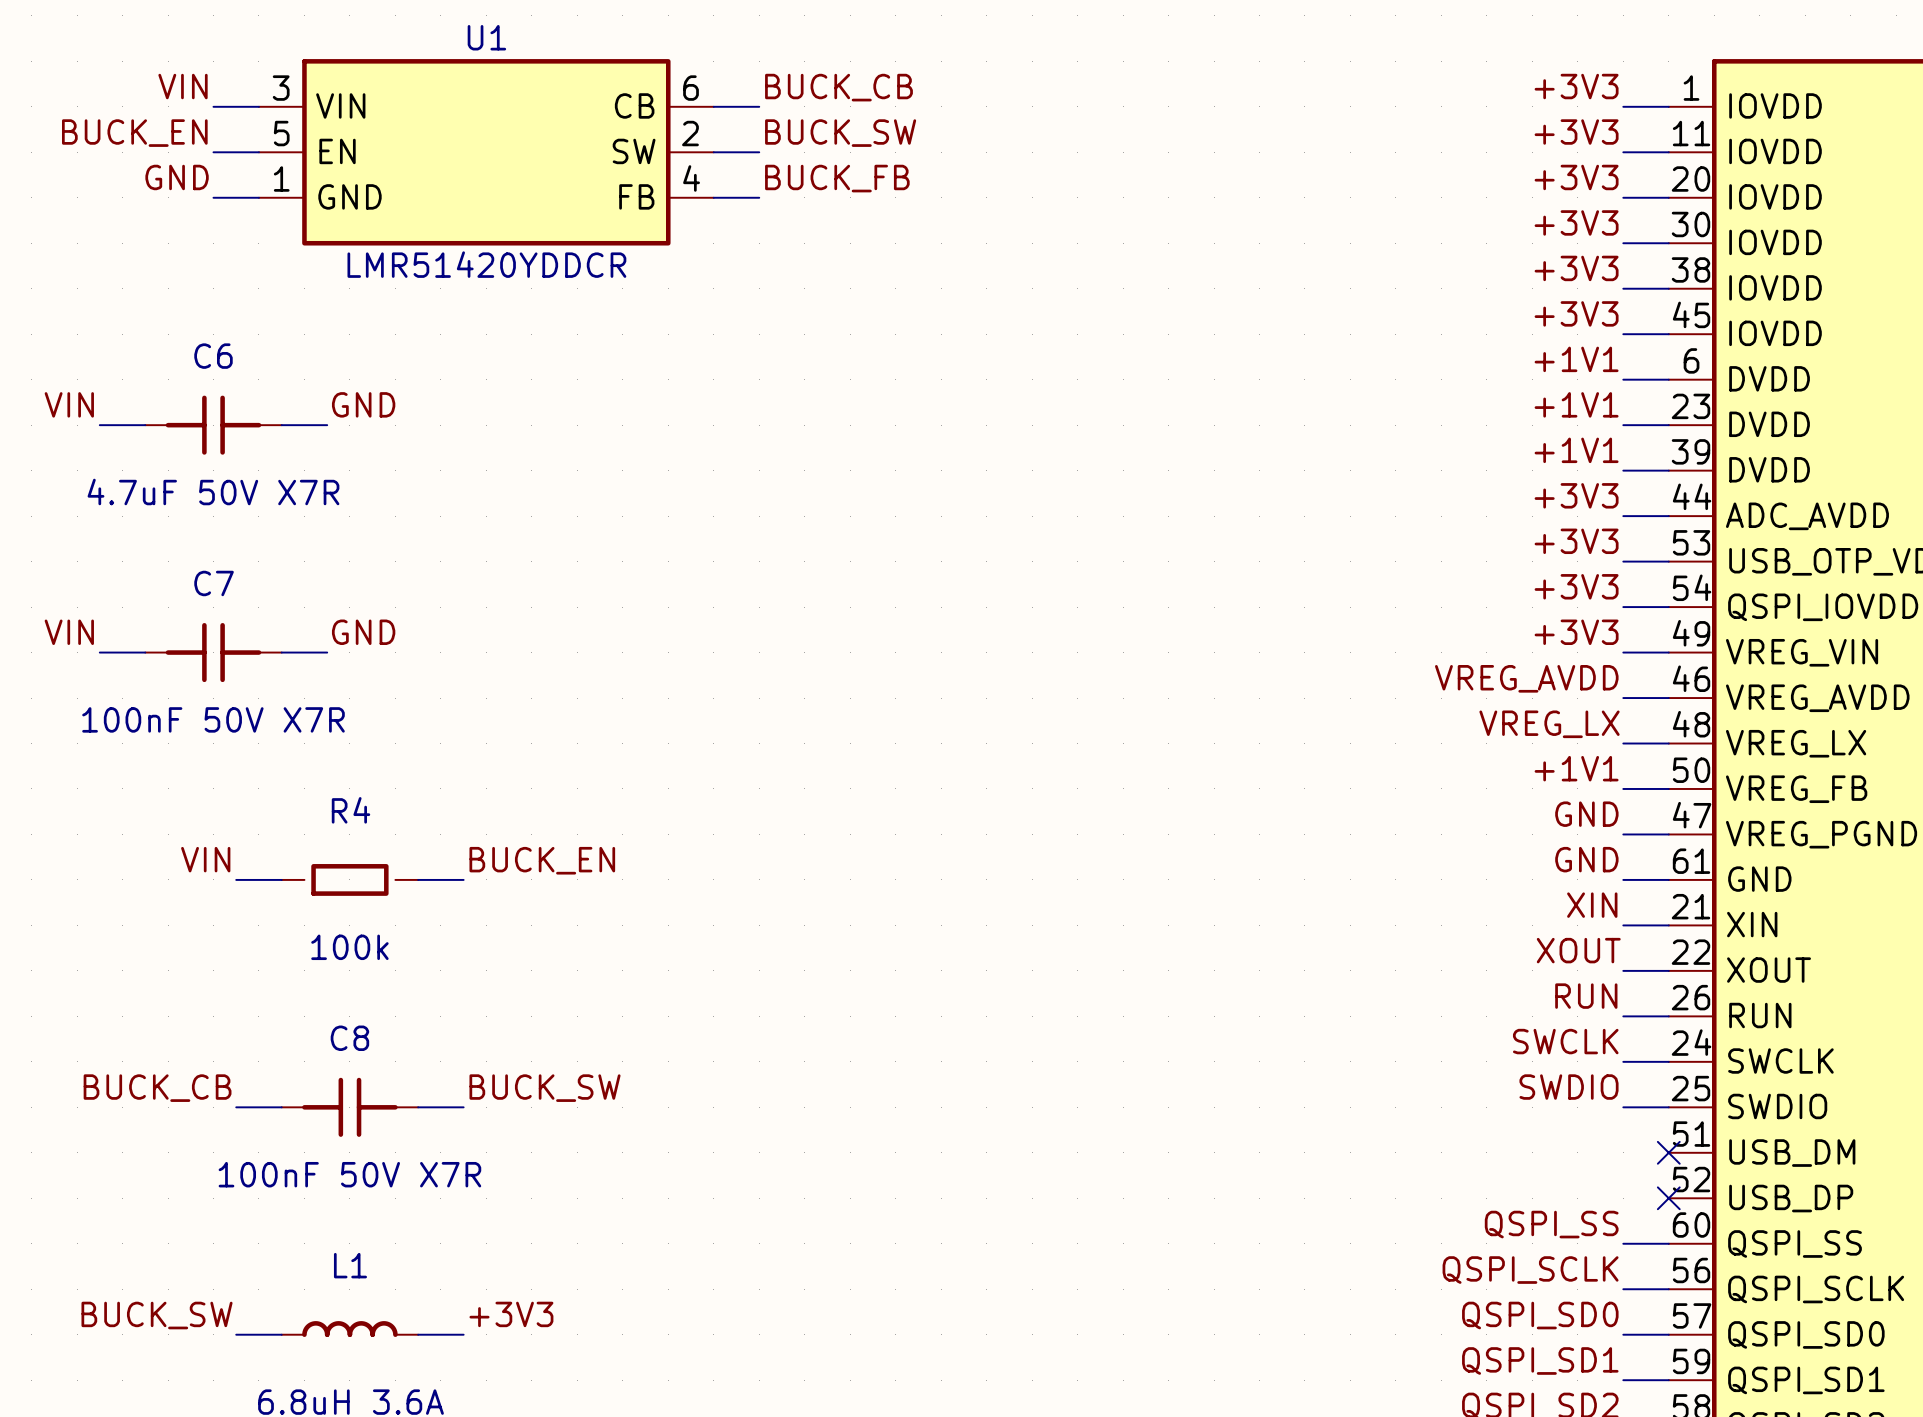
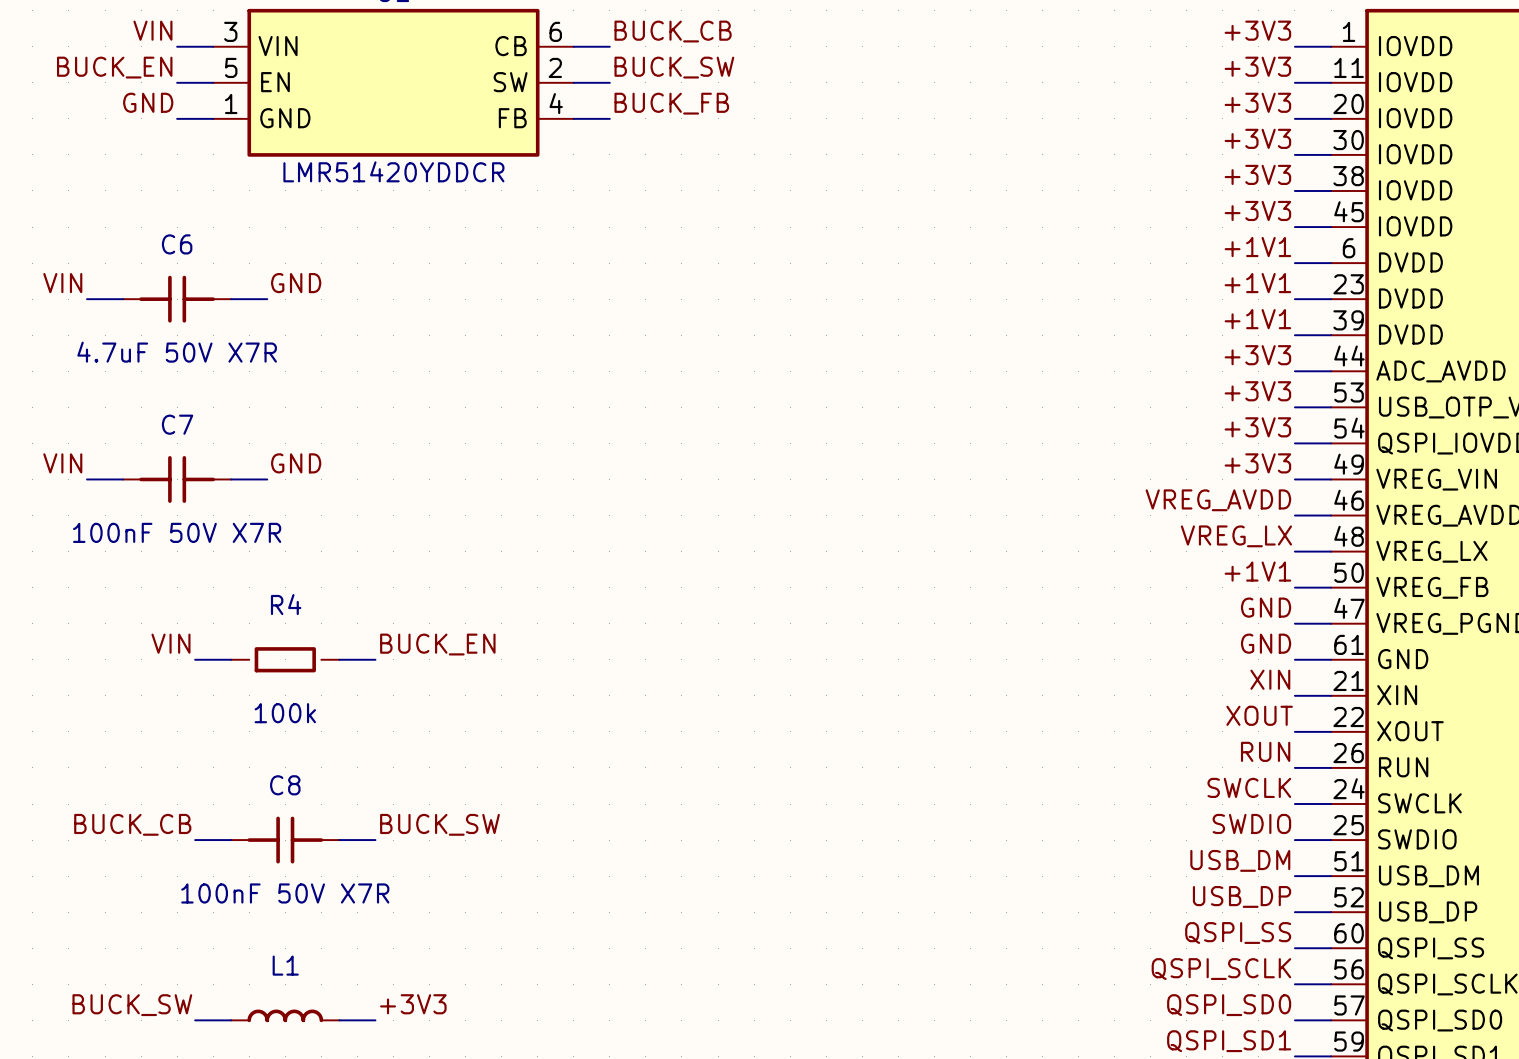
label: none -> USB_DM (1240, 860)
wire: none -> (1294, 876) (1331, 876)
no-connect mark: (1668, 1152) -> none
label: none -> USB_DP (1242, 896)
wire: none -> (1294, 912) (1331, 912)
no-connect mark: (1668, 1198) -> none

